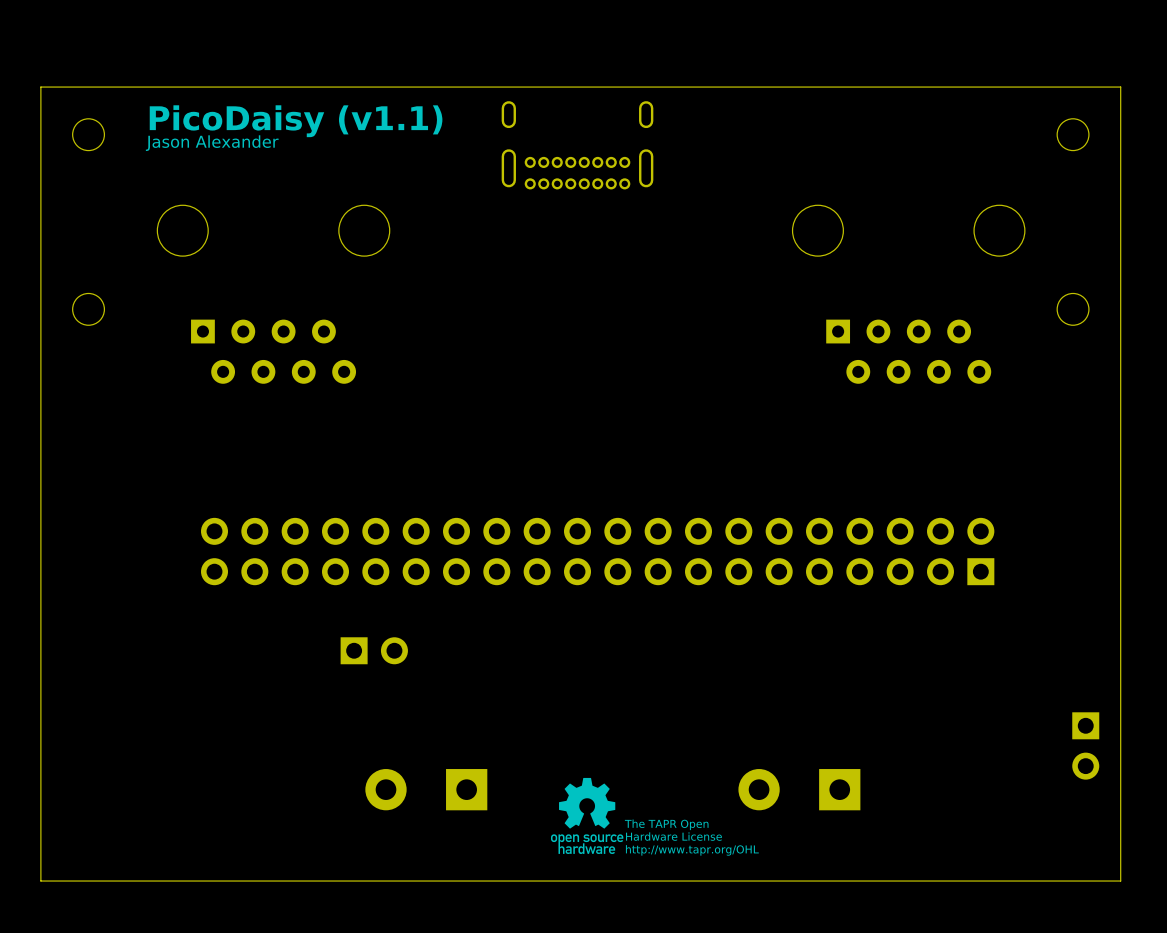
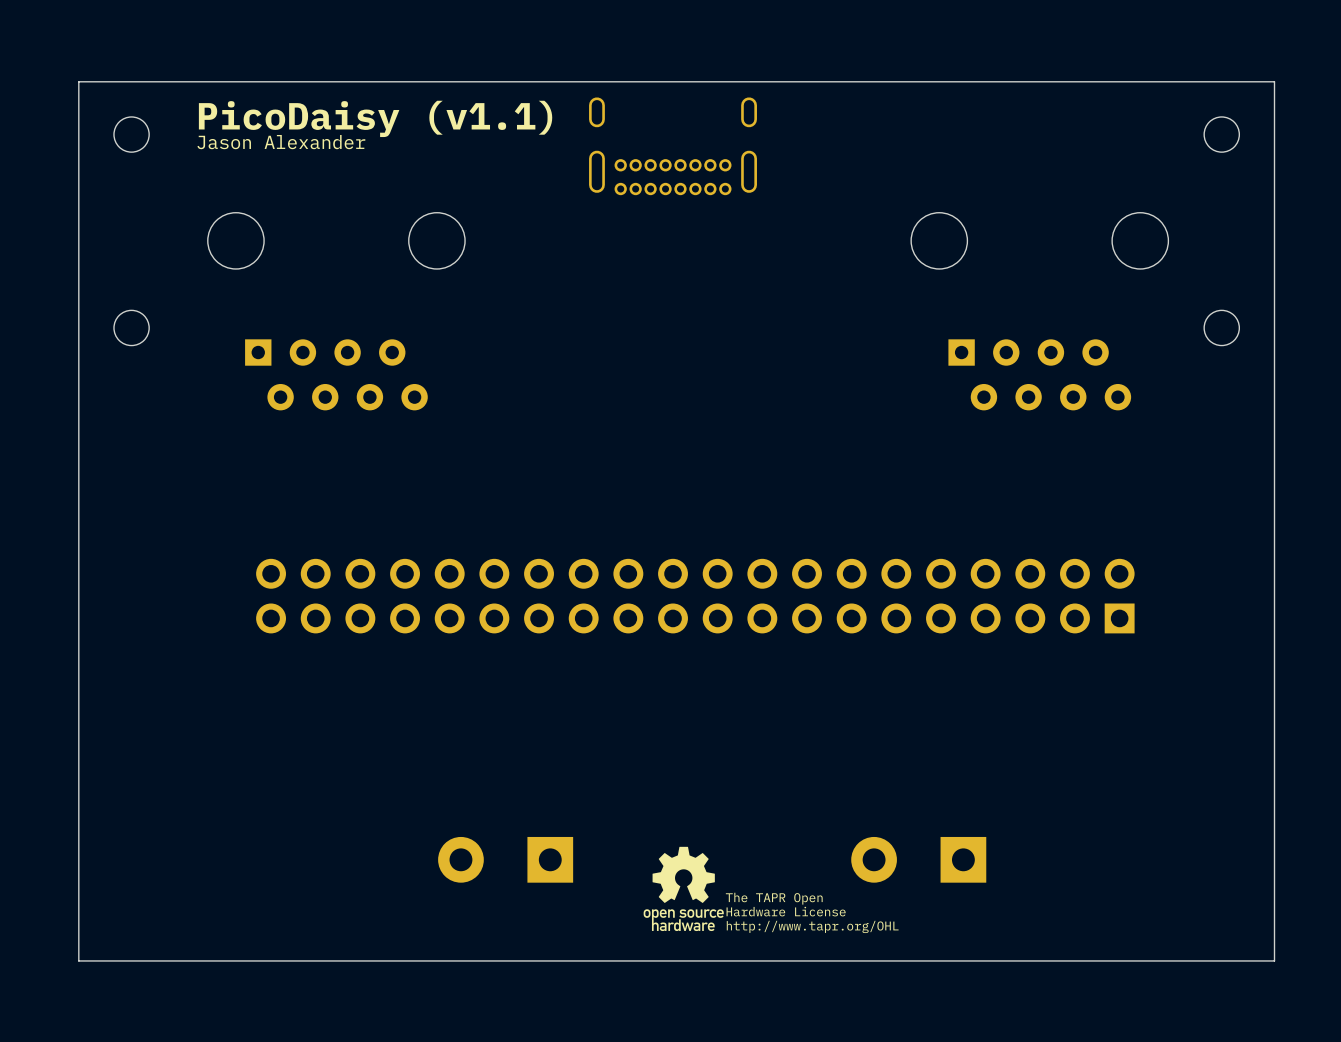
part: (374, 650) -> none
part: (1085, 745) -> none

